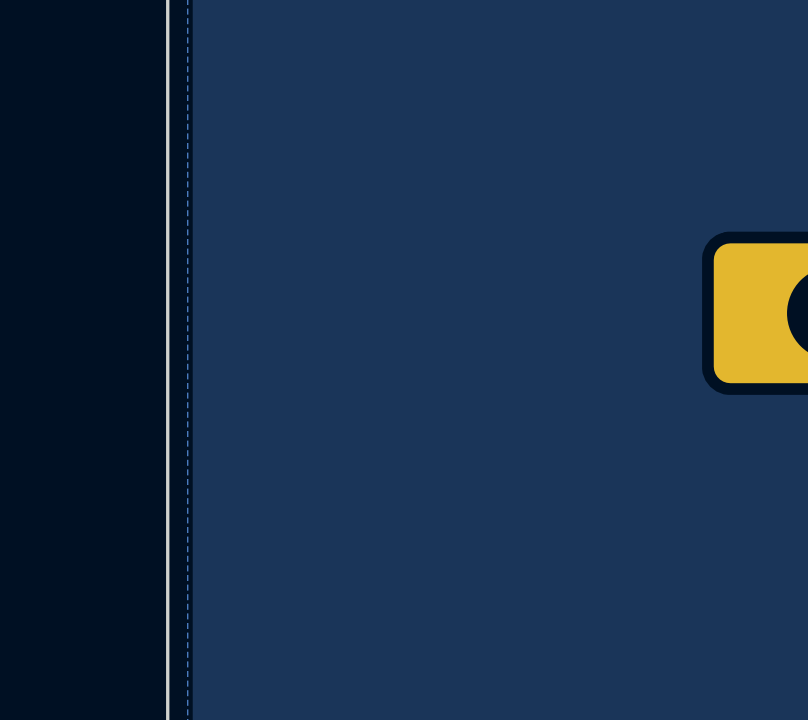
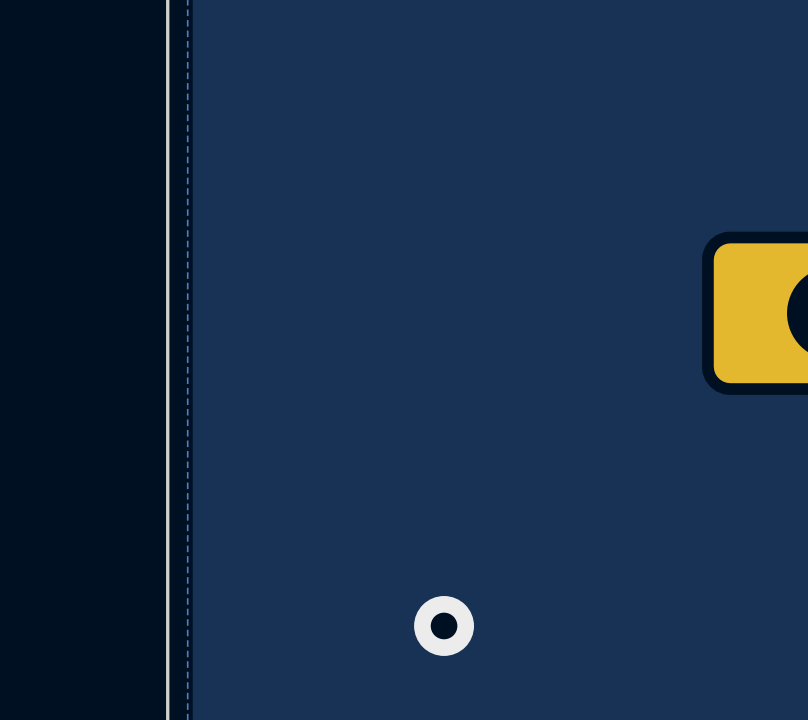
via: none -> (444, 625)

